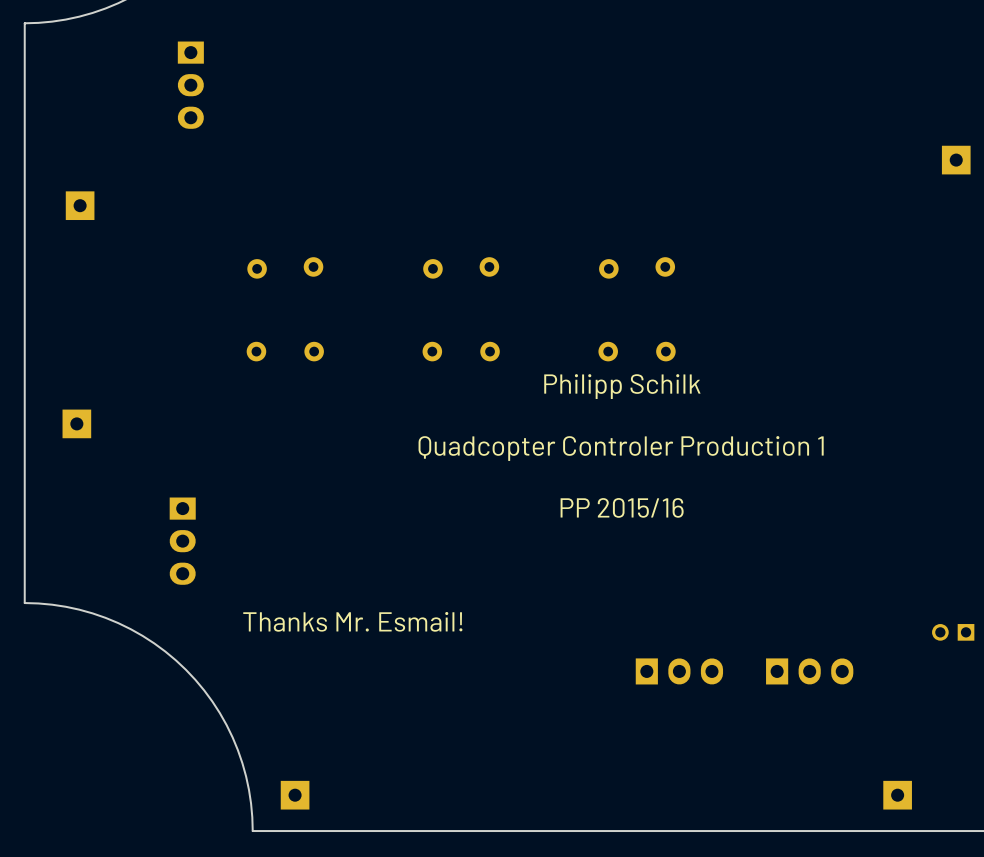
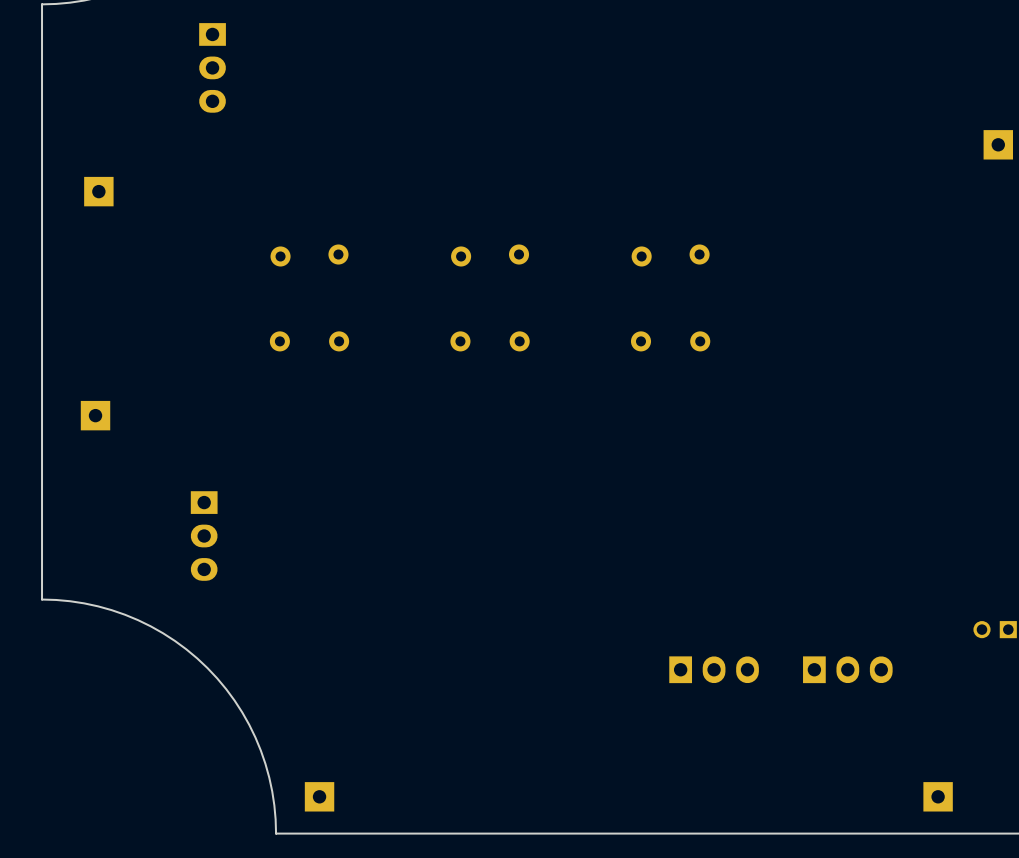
text: Philipp Schilk (622, 386) -> none
text: Quadcopter Controler Production 1 (621, 448) -> none
text: PP 2015/16 (622, 507) -> none
text: Thanks Mr. Esmail! (352, 621) -> none

